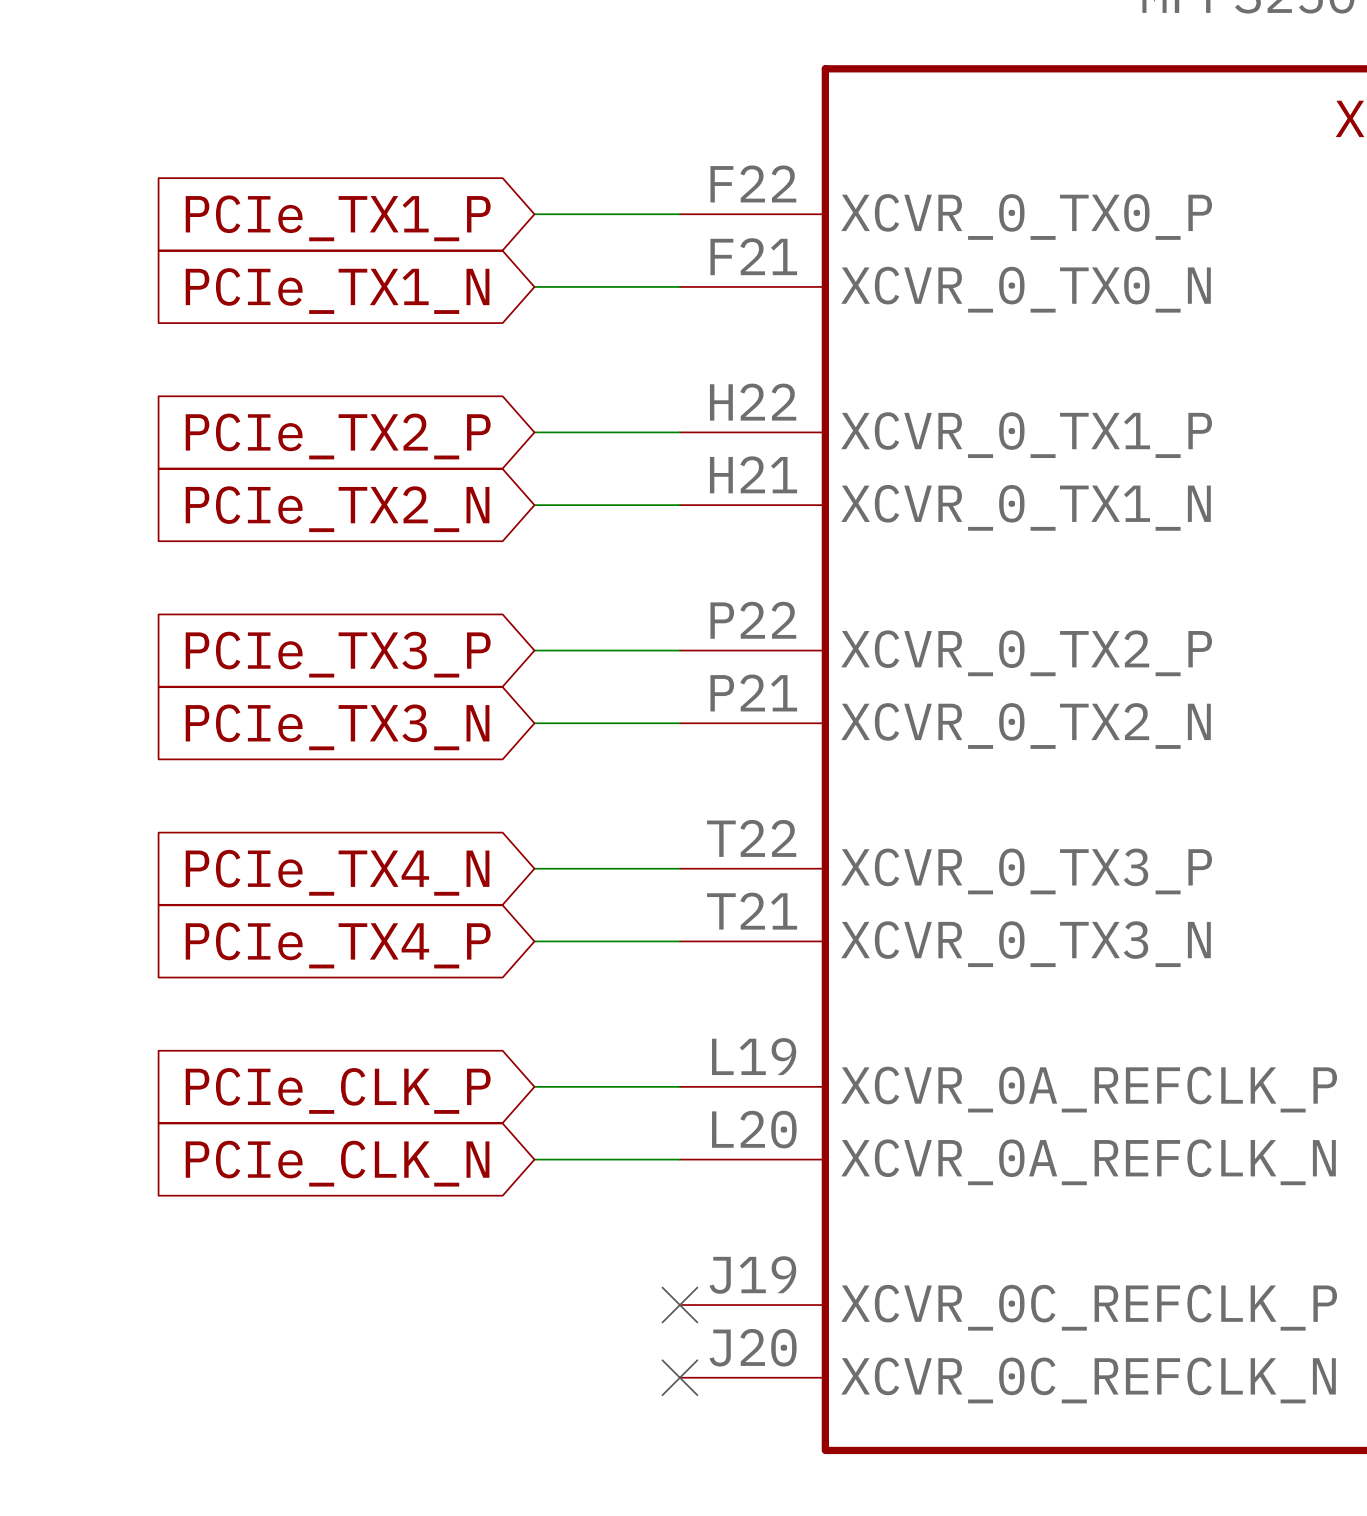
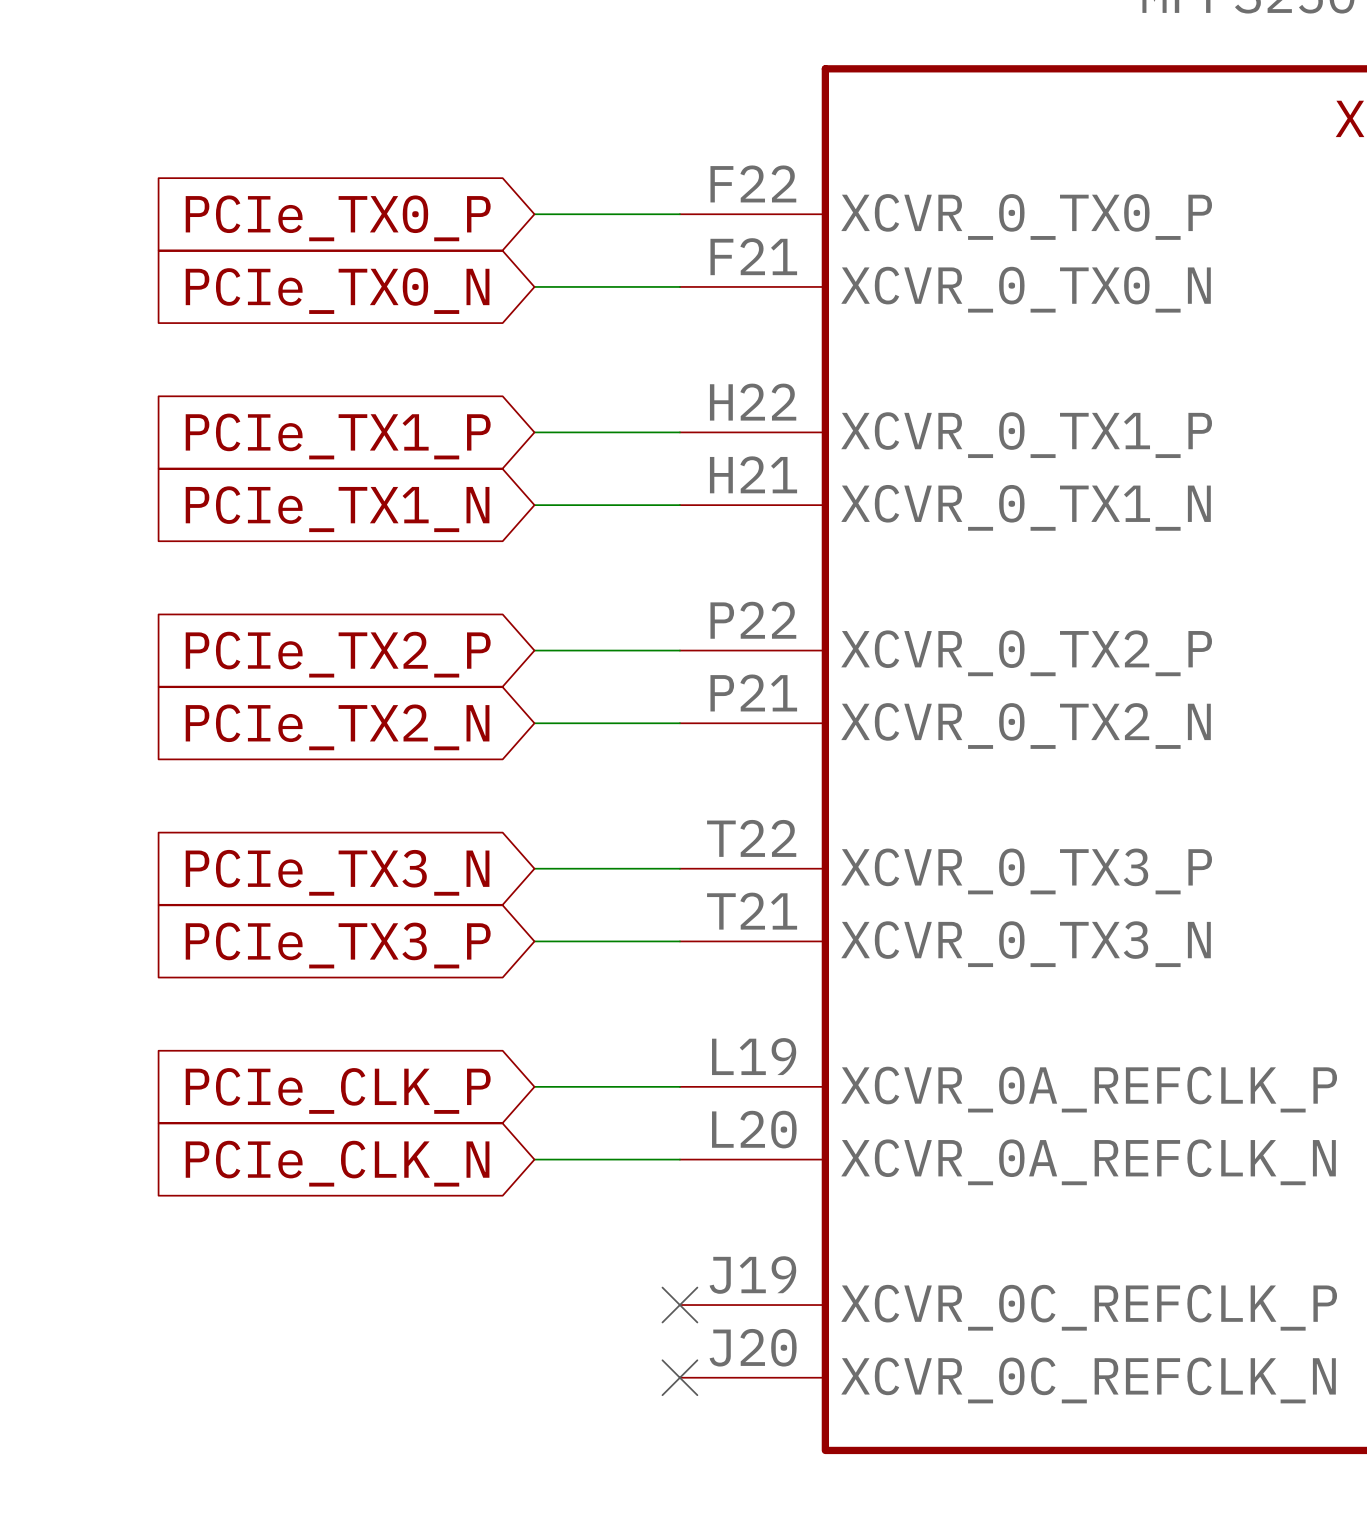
global label: PCIe_TX1_P (338, 218) -> PCIe_TX0_P (338, 218)
global label: PCIe_TX1_N (337, 291) -> PCIe_TX0_N (337, 291)
global label: PCIe_TX2_P (338, 436) -> PCIe_TX1_P (338, 436)
global label: PCIe_TX2_N (337, 509) -> PCIe_TX1_N (337, 509)
global label: PCIe_TX3_P (338, 654) -> PCIe_TX2_P (338, 654)
global label: PCIe_TX3_N (337, 727) -> PCIe_TX2_N (337, 727)
global label: PCIe_TX4_N (337, 872) -> PCIe_TX3_N (337, 872)
global label: PCIe_TX4_P (338, 945) -> PCIe_TX3_P (338, 945)

